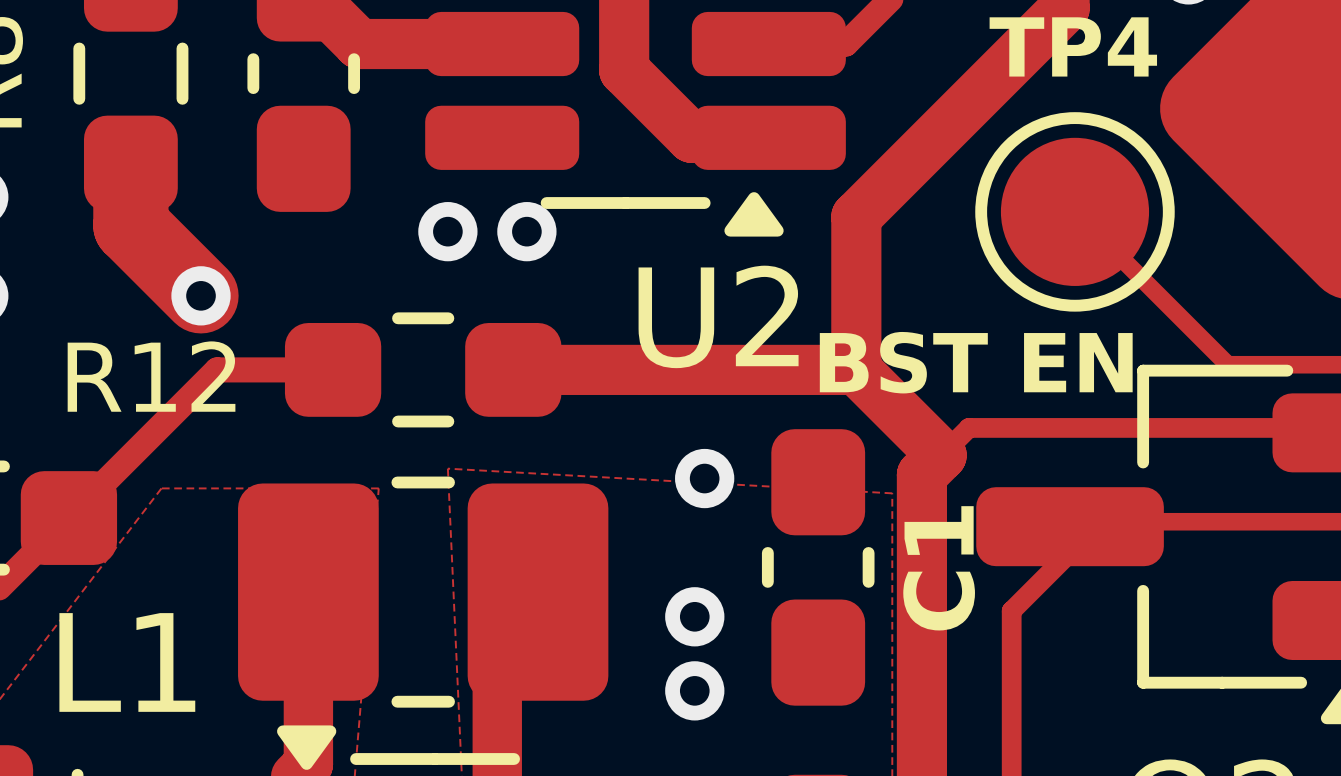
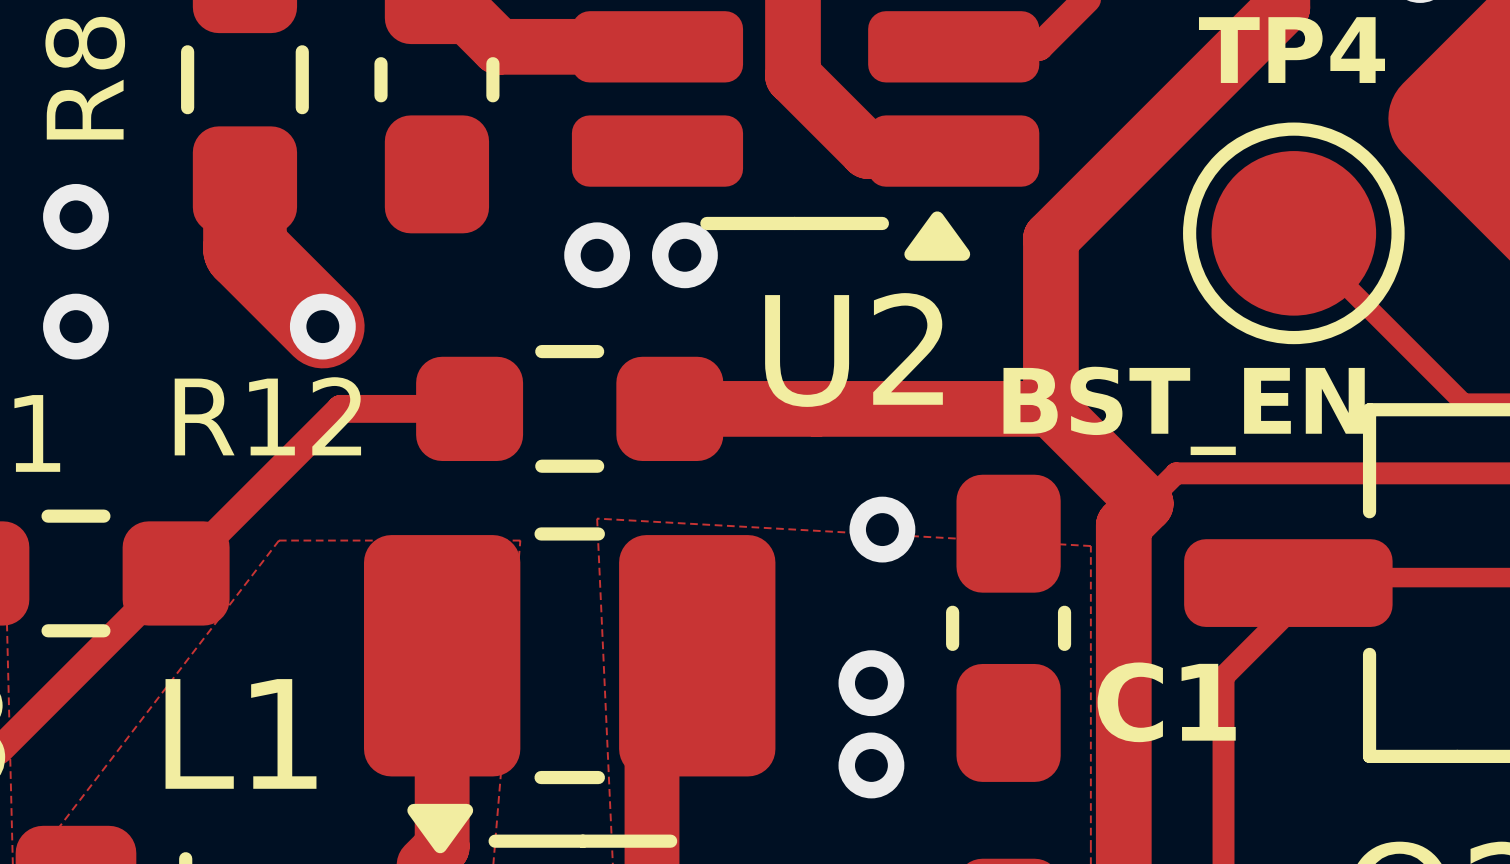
U2 name position: U2 (718, 316) -> U2 (853, 350)
TP4 text: BST EN (976, 362) -> BST_EN (1184, 410)
C1 name rotation: 0° (939, 568) -> 90° clockwise (1166, 702)

